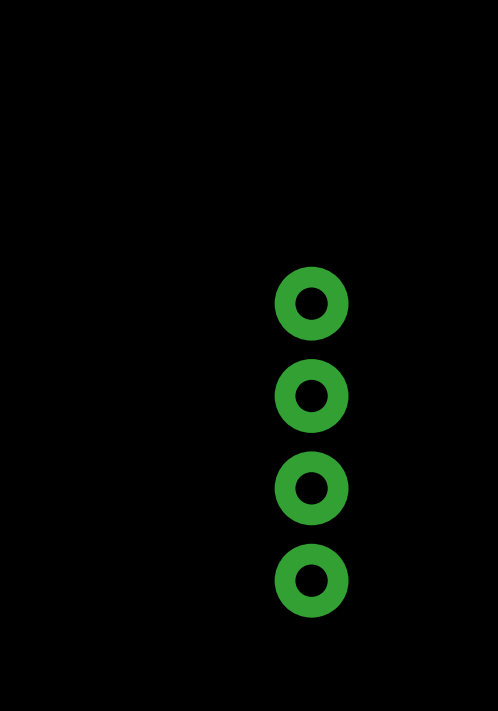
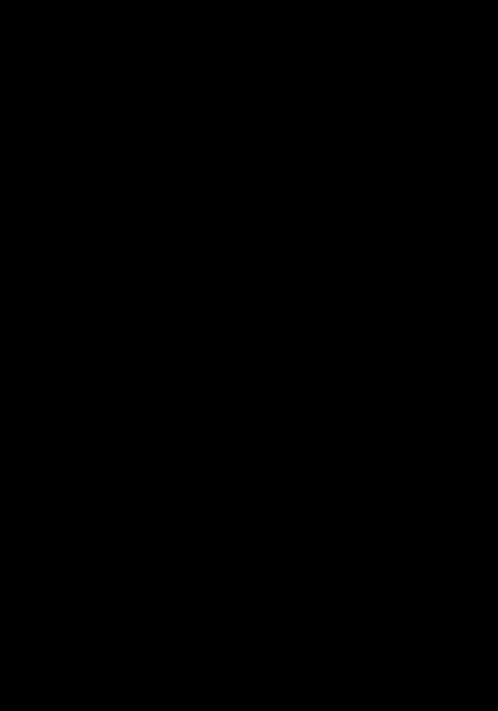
part: (311, 442) -> none

